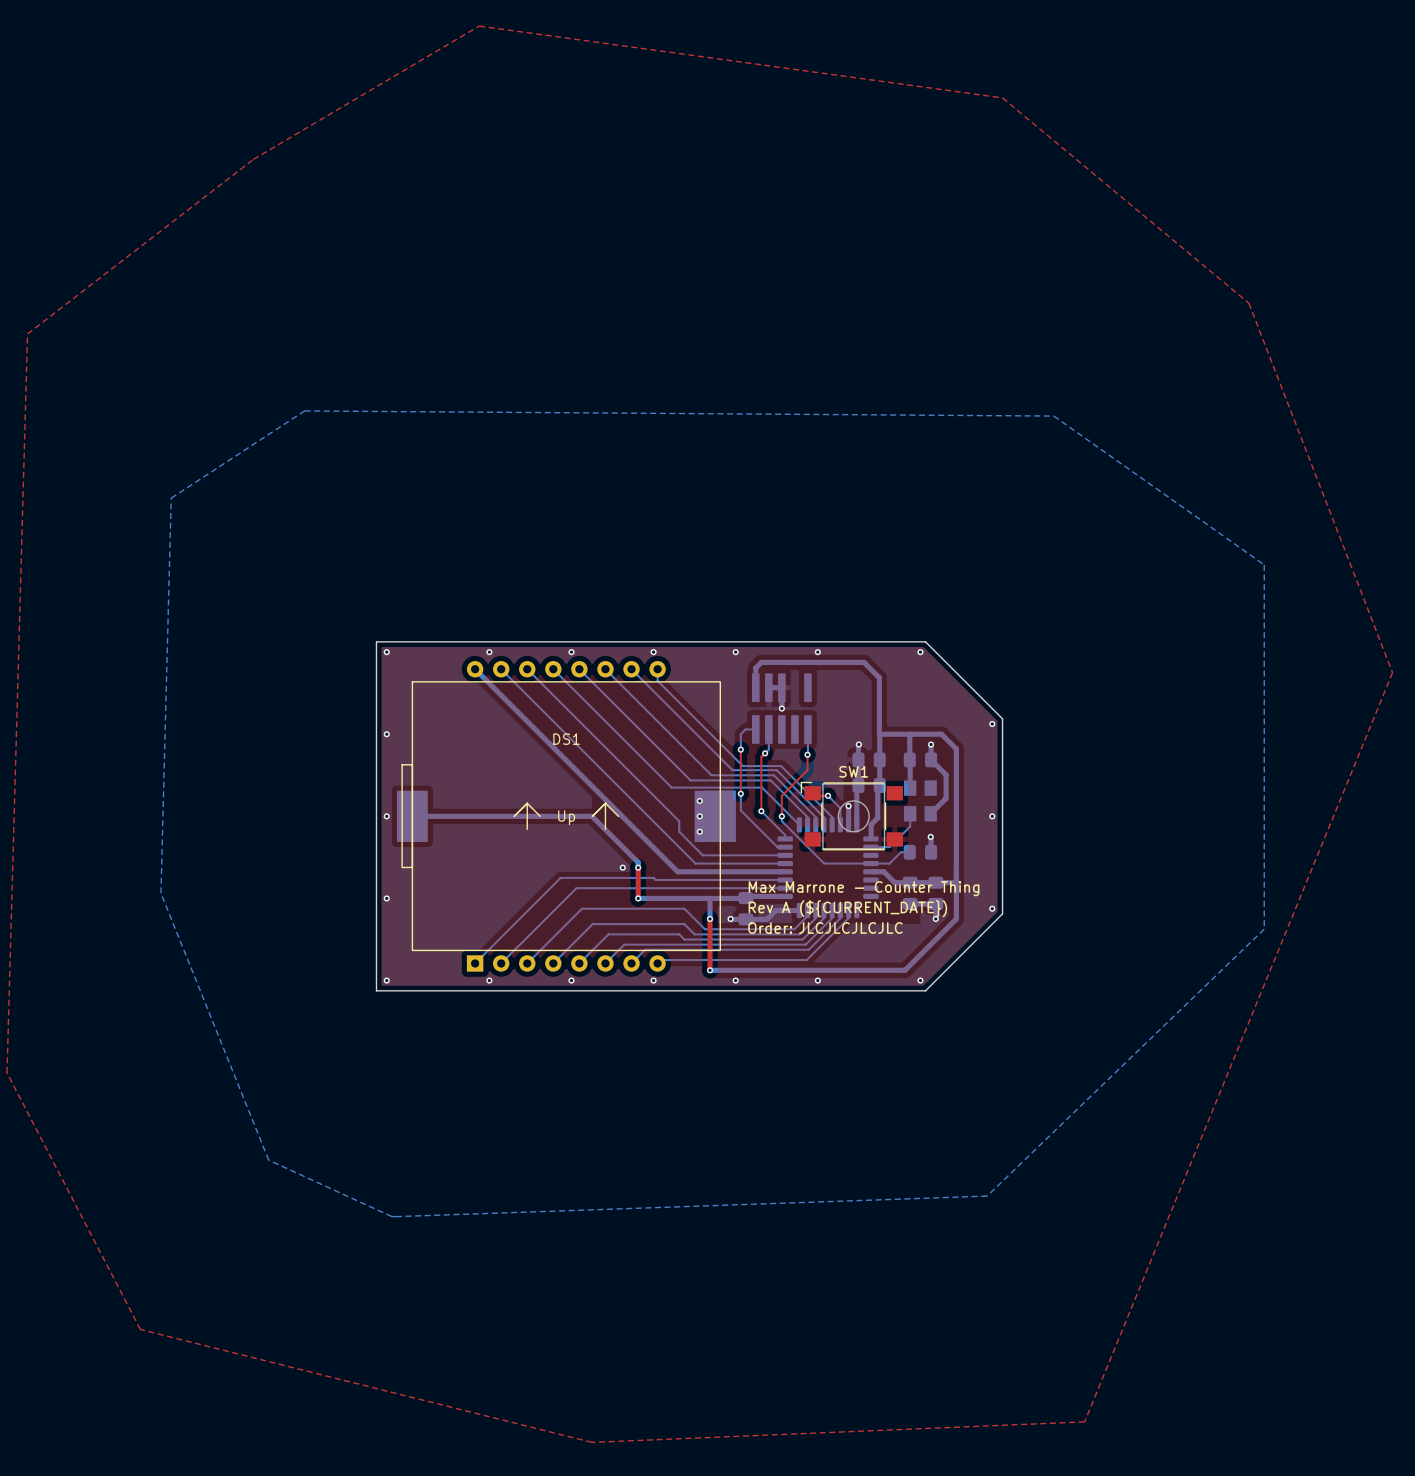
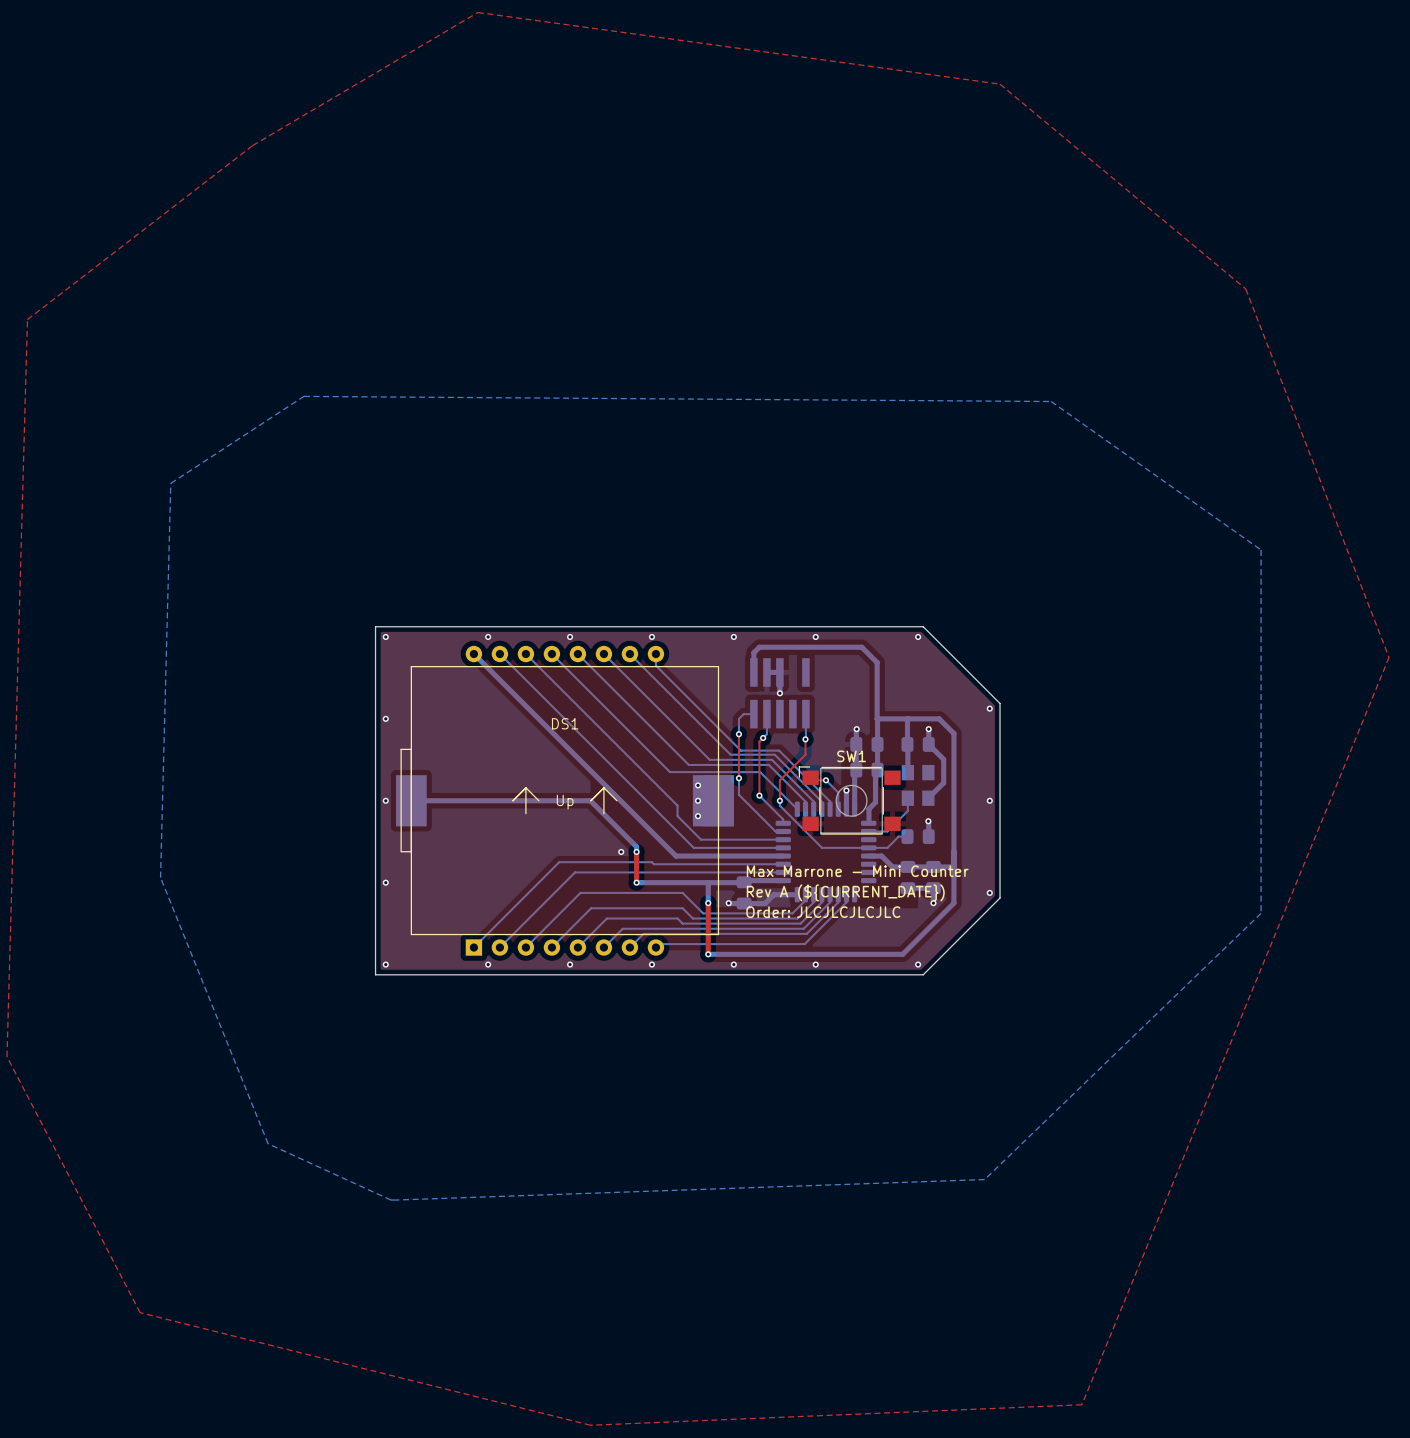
text: Max Marrone - Counter Thing (864, 888) -> Max Marrone - Mini Counter (857, 871)

